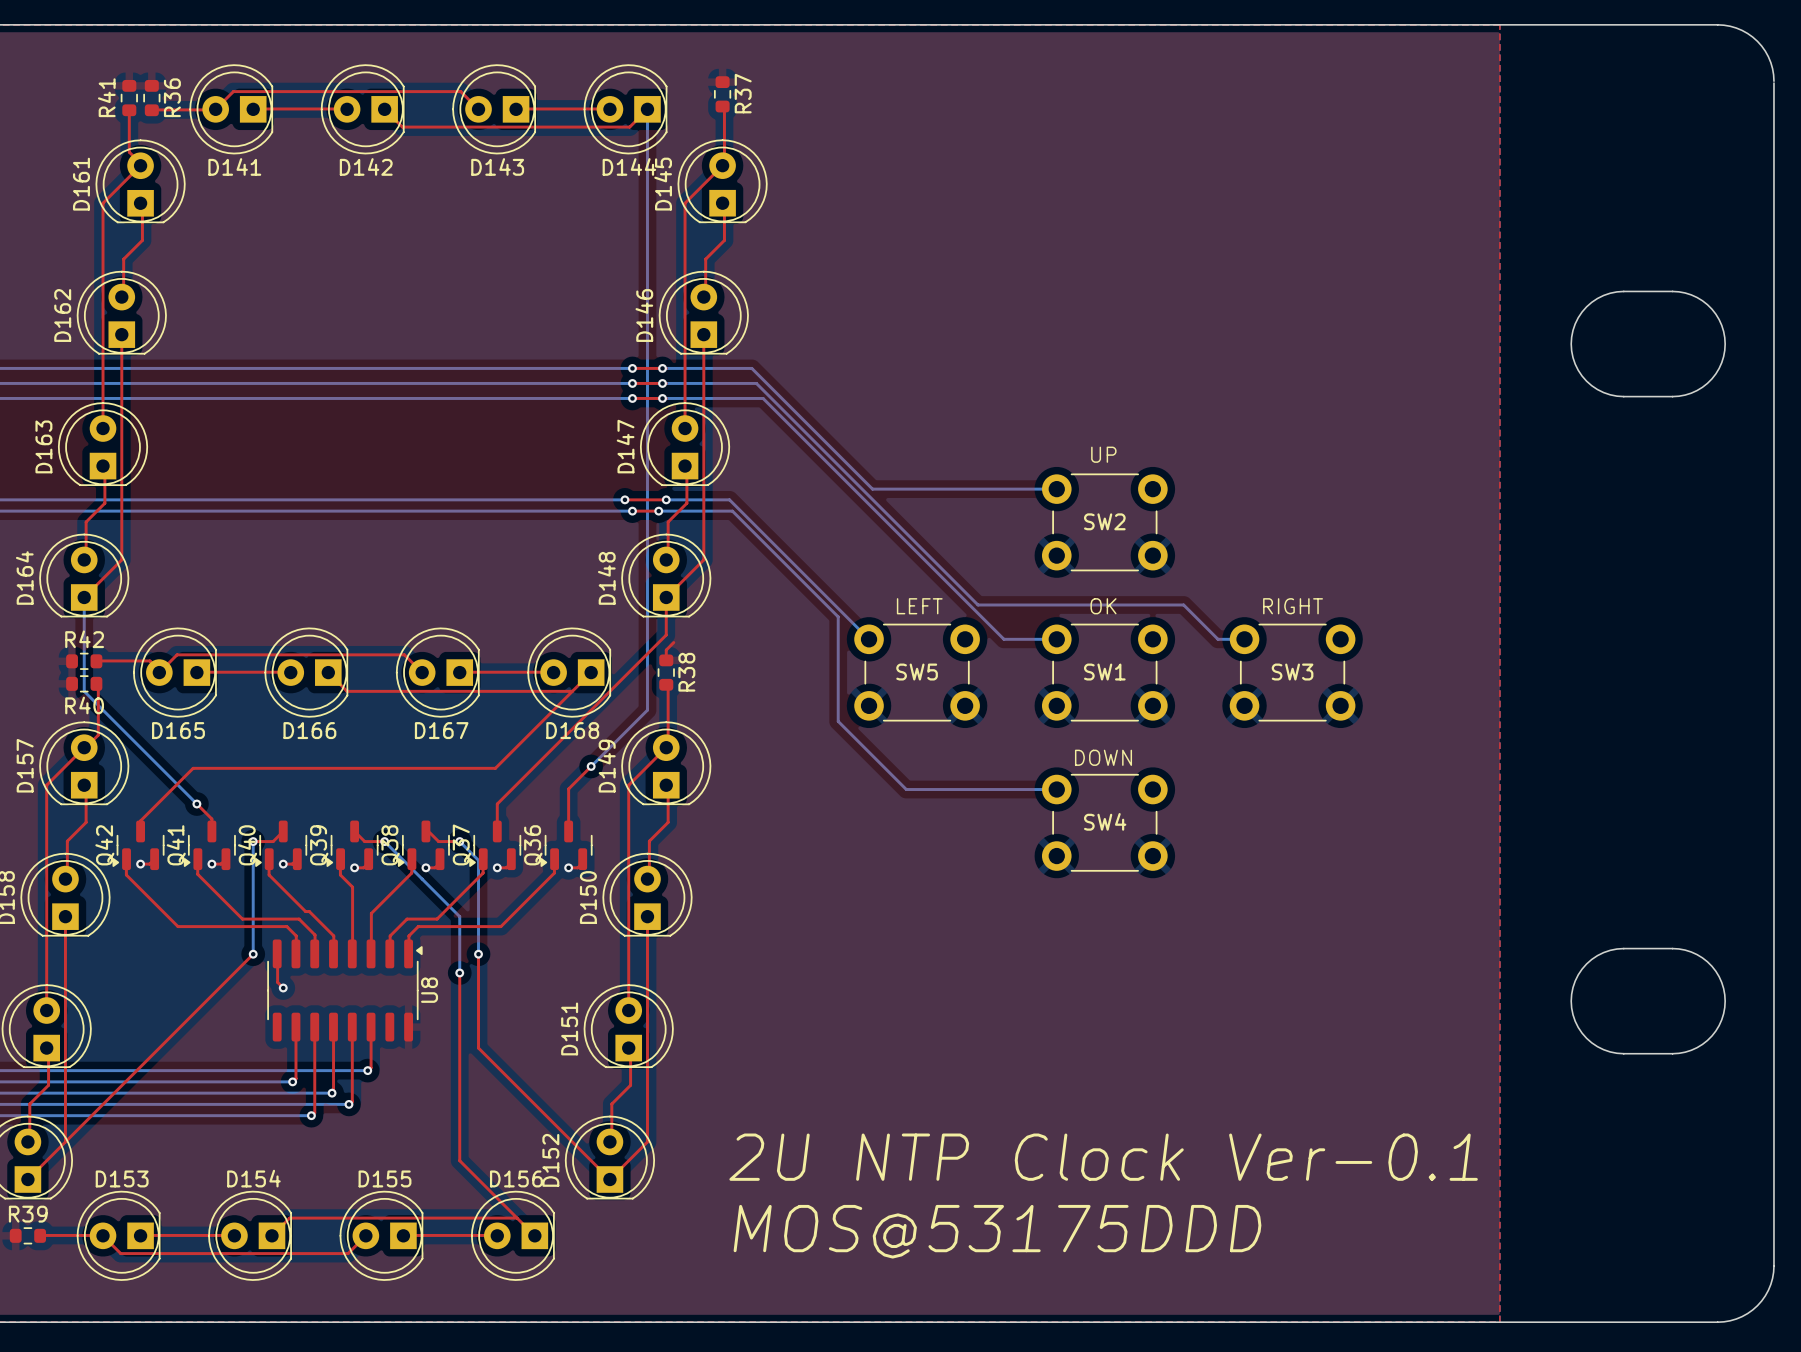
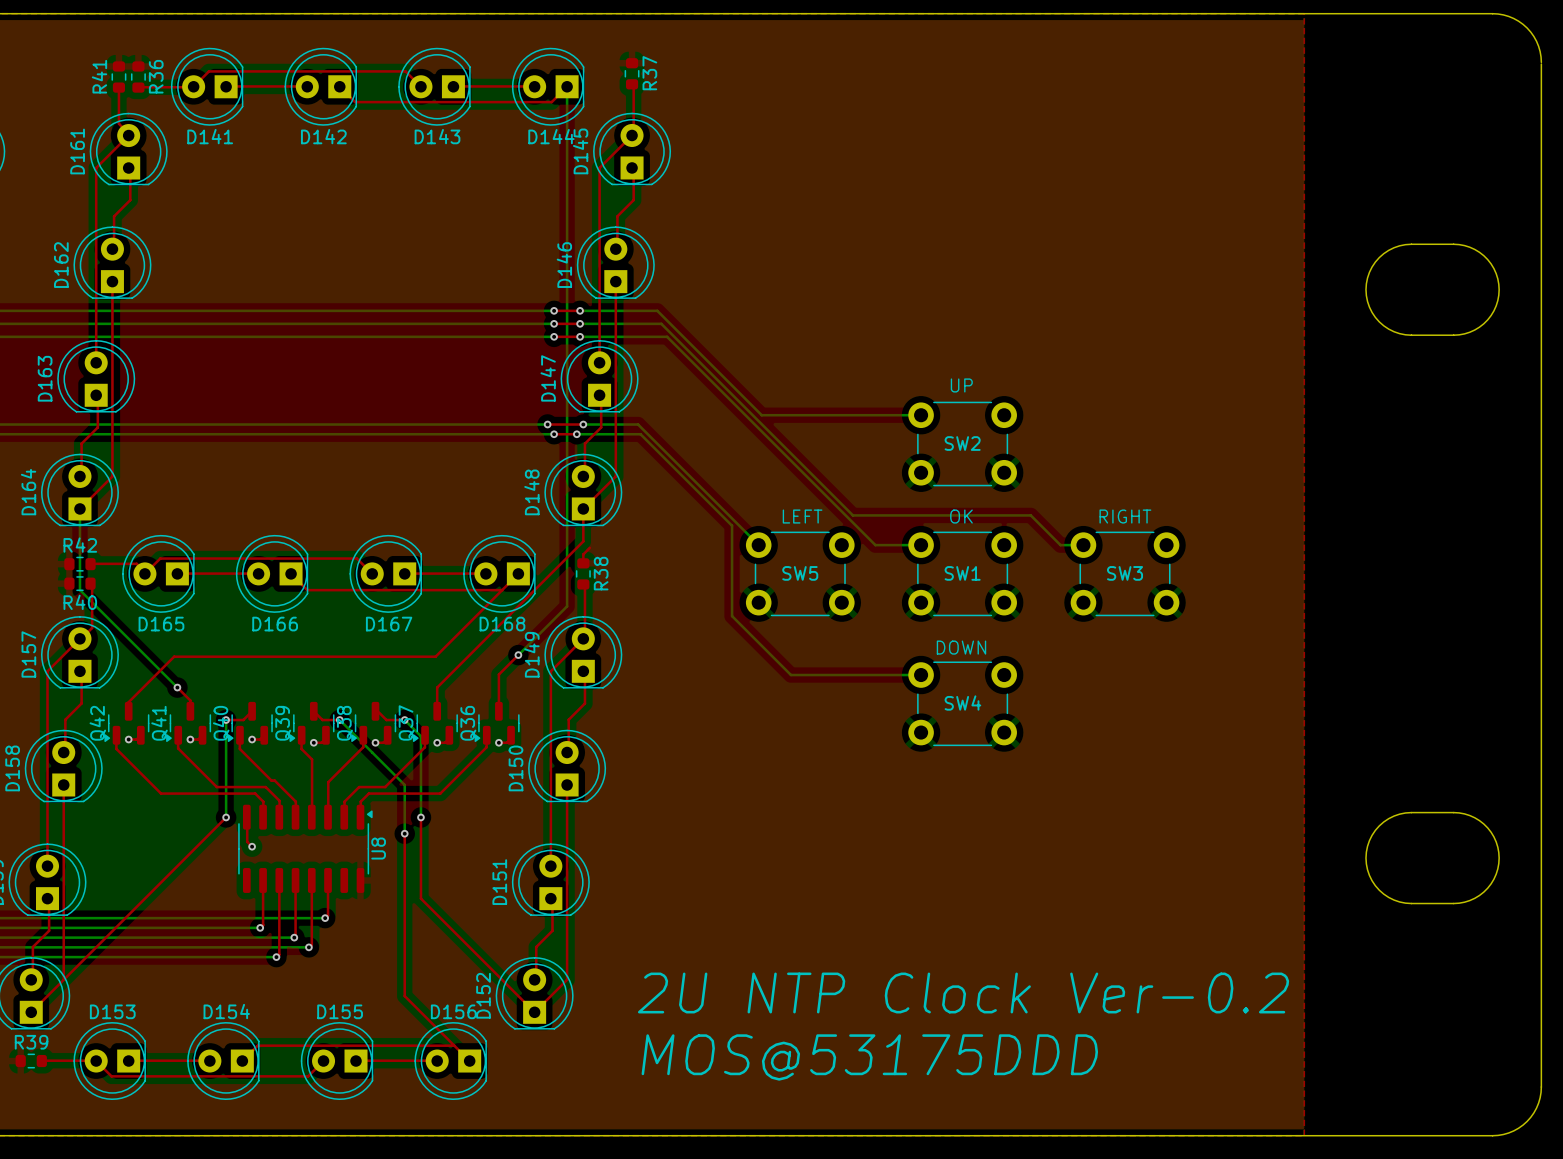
text: 2U NTP Clock Ver-0.1 (1103, 1157) -> 2U NTP Clock Ver-0.2 (963, 992)

